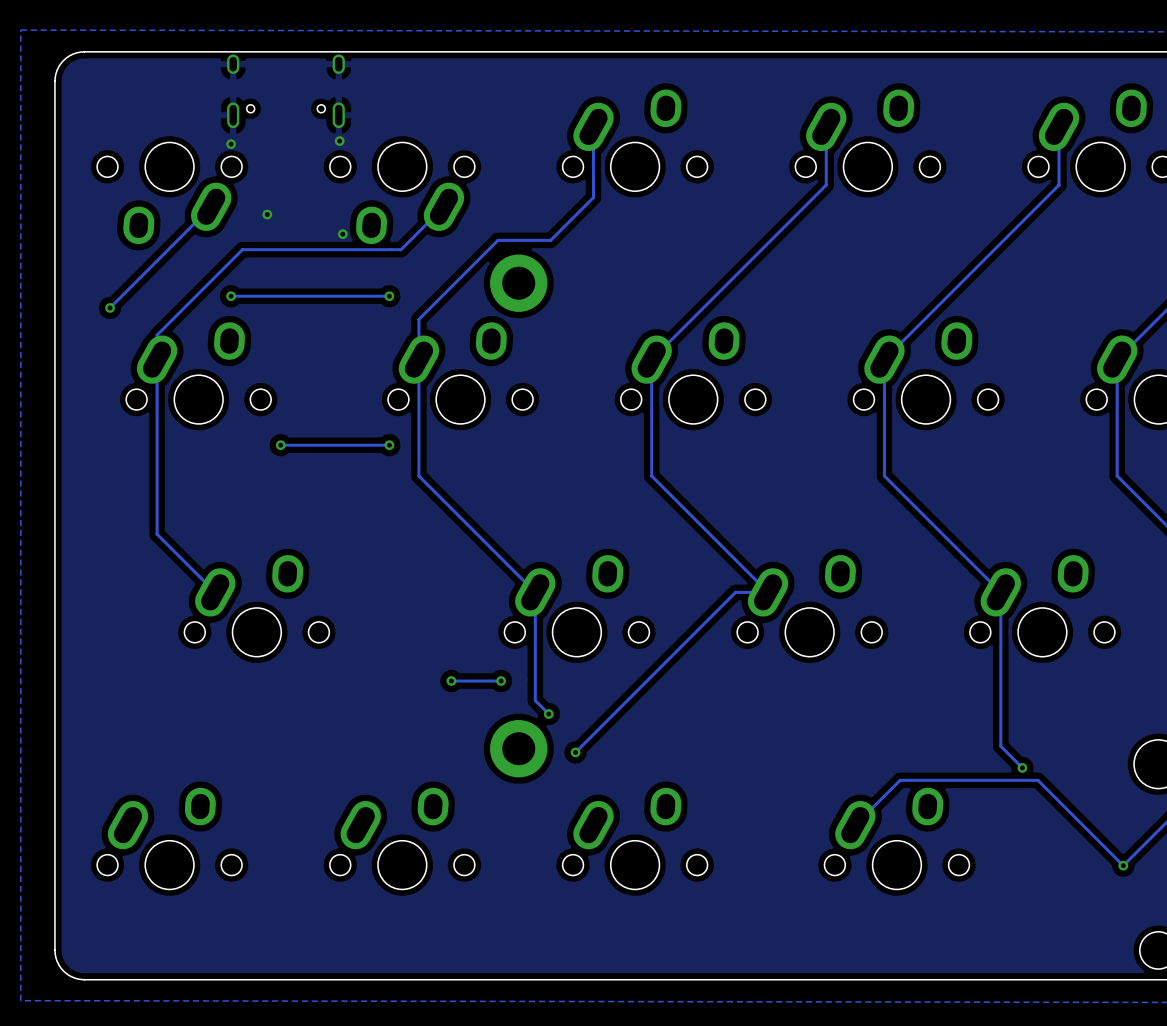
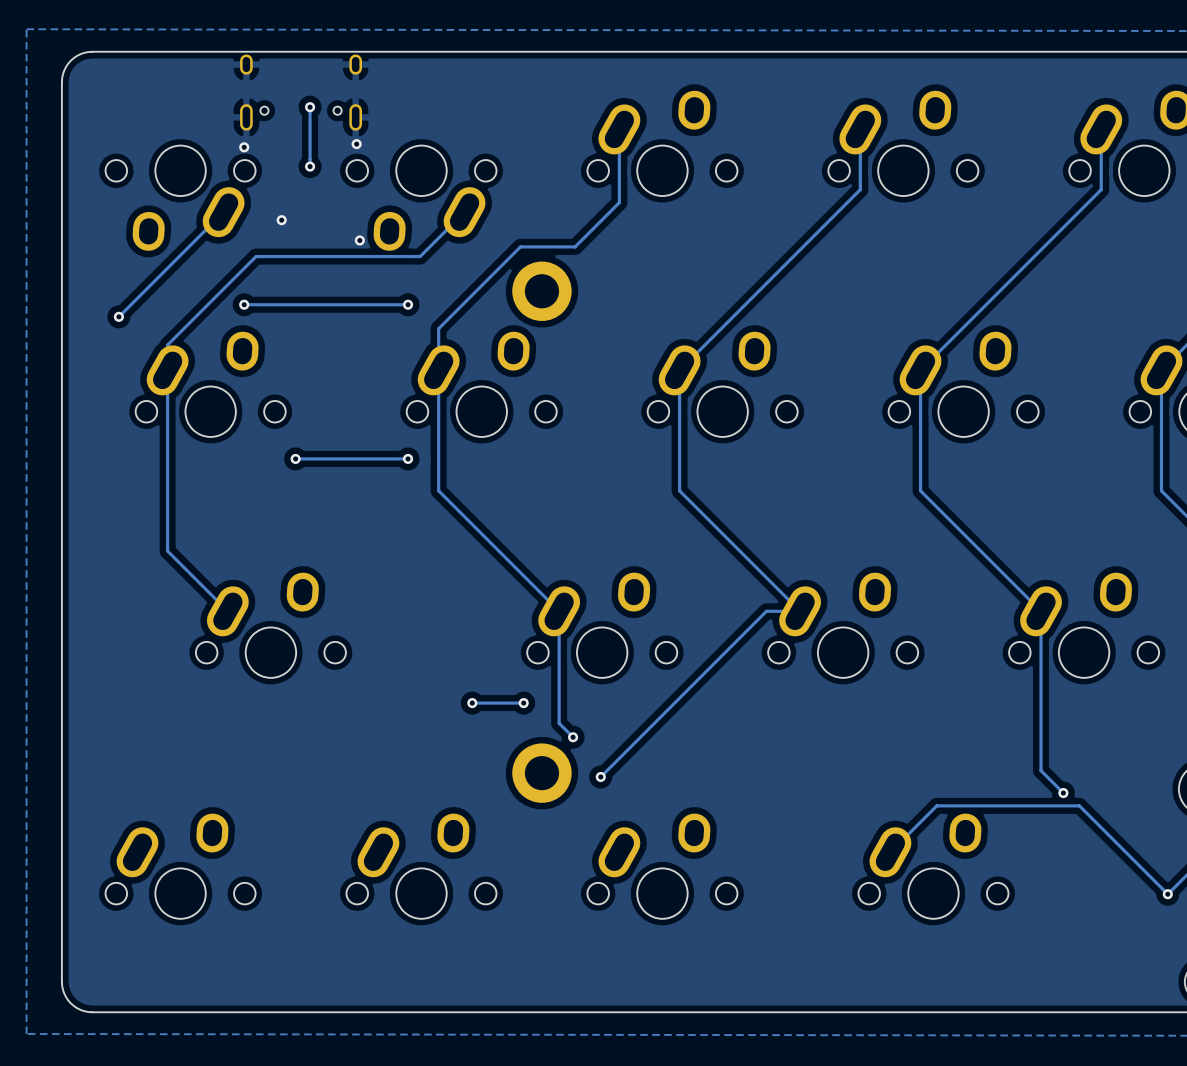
track: none -> (310, 107) (310, 166)
via: none -> (310, 107)
via: none -> (310, 166)

